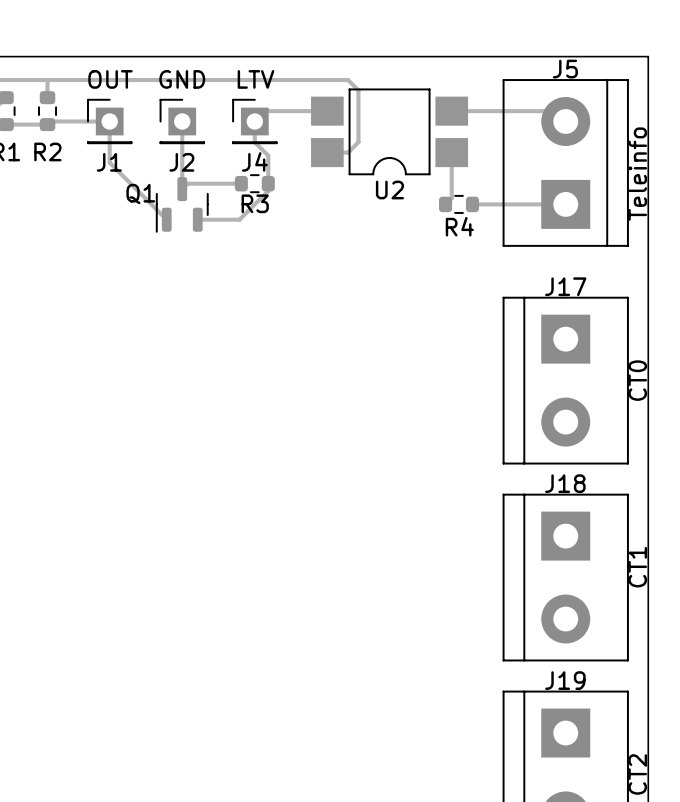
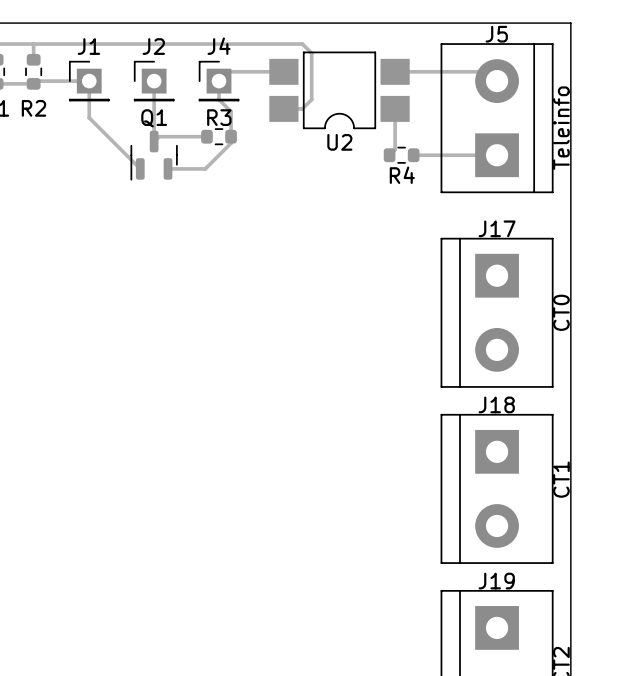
text: OUT (110, 79) -> none
text: GND (182, 79) -> none
text: LTV (255, 79) -> none
J4 name position: J4 (254, 161) -> J4 (219, 46)
J1 name position: J1 (109, 162) -> J1 (88, 46)
J2 name position: J2 (181, 162) -> J2 (153, 46)
Q1 name position: Q1 (140, 193) -> Q1 (154, 118)
R3 name position: R3 (255, 203) -> R3 (219, 117)

